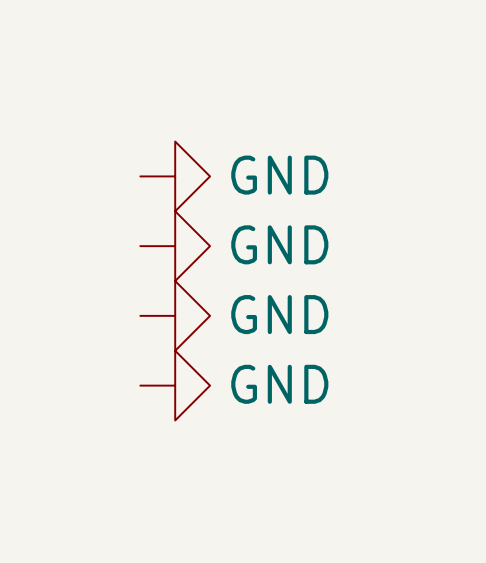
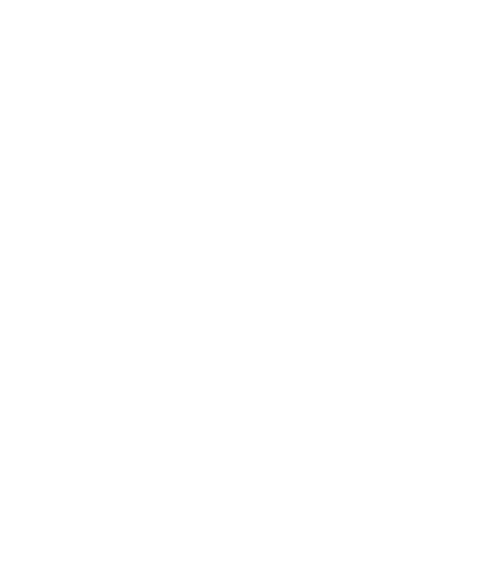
power symbol: GND (175, 176) -> none
power symbol: GND (175, 246) -> none
power symbol: GND (175, 315) -> none
power symbol: GND (175, 385) -> none

